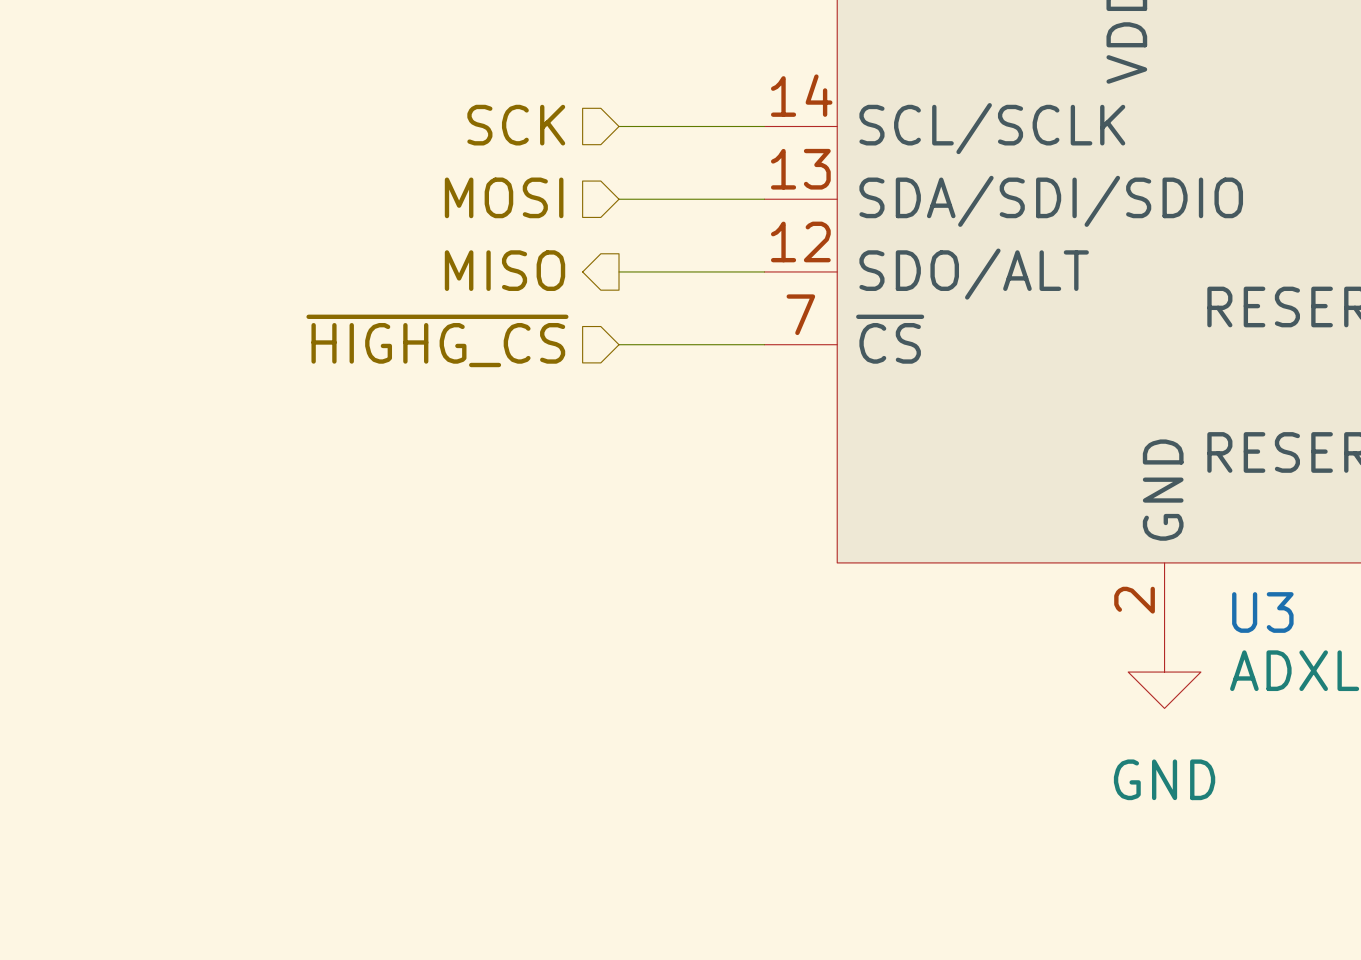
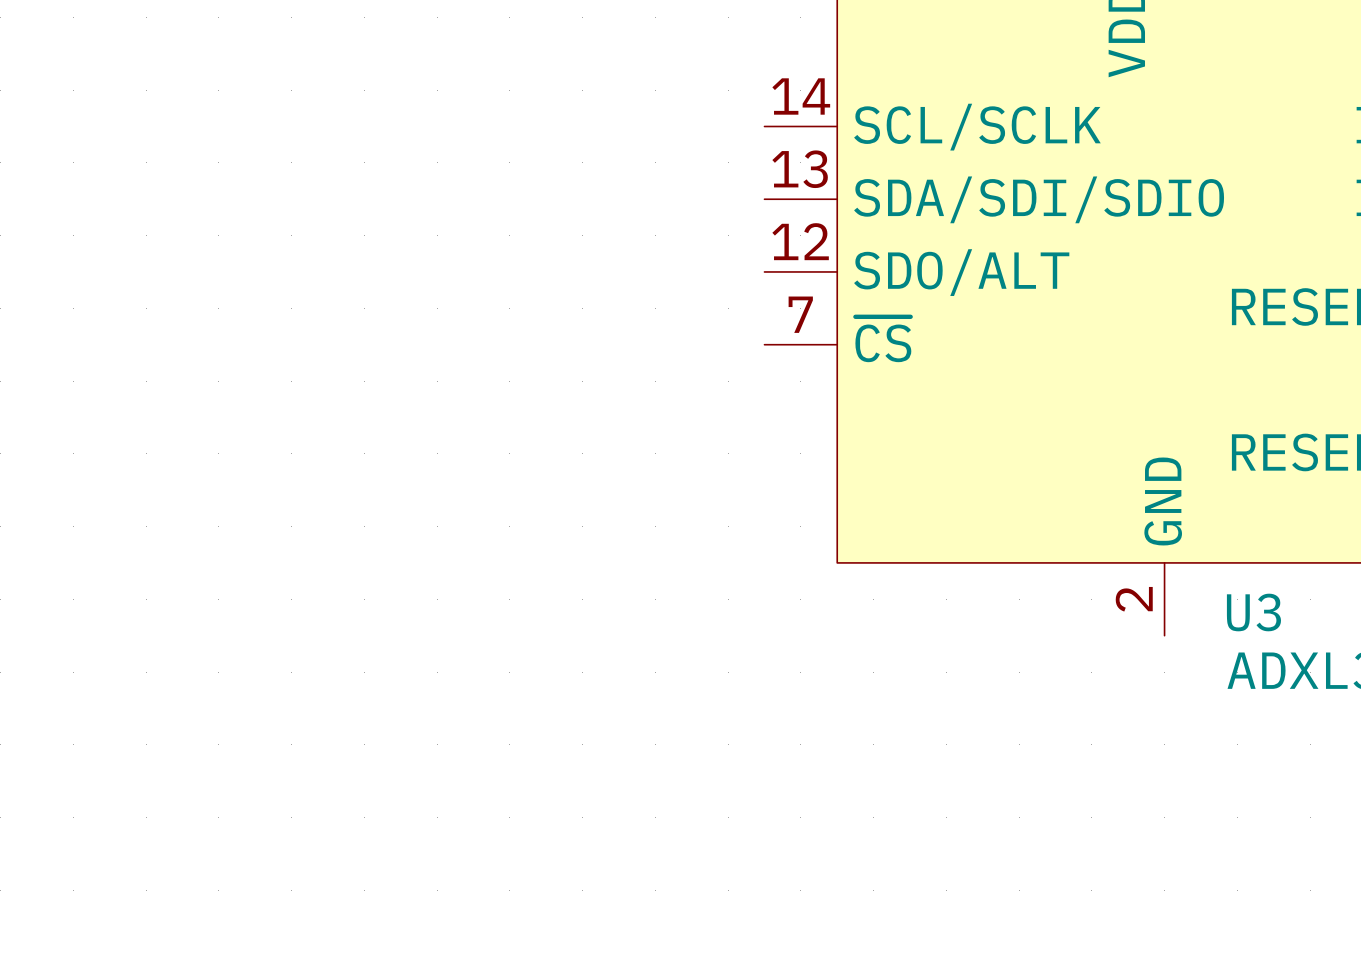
hierarchical label: SCK (516, 125) -> none
wire: (619, 126) (764, 126) -> none
hierarchical label: MOSI (504, 197) -> none
wire: (619, 199) (764, 199) -> none
hierarchical label: MISO (505, 270) -> none
wire: (619, 271) (764, 271) -> none
hierarchical label: ~{HIGHG_CS} (437, 340) -> none
wire: (619, 344) (764, 344) -> none
power symbol: GND (1164, 672) -> none

